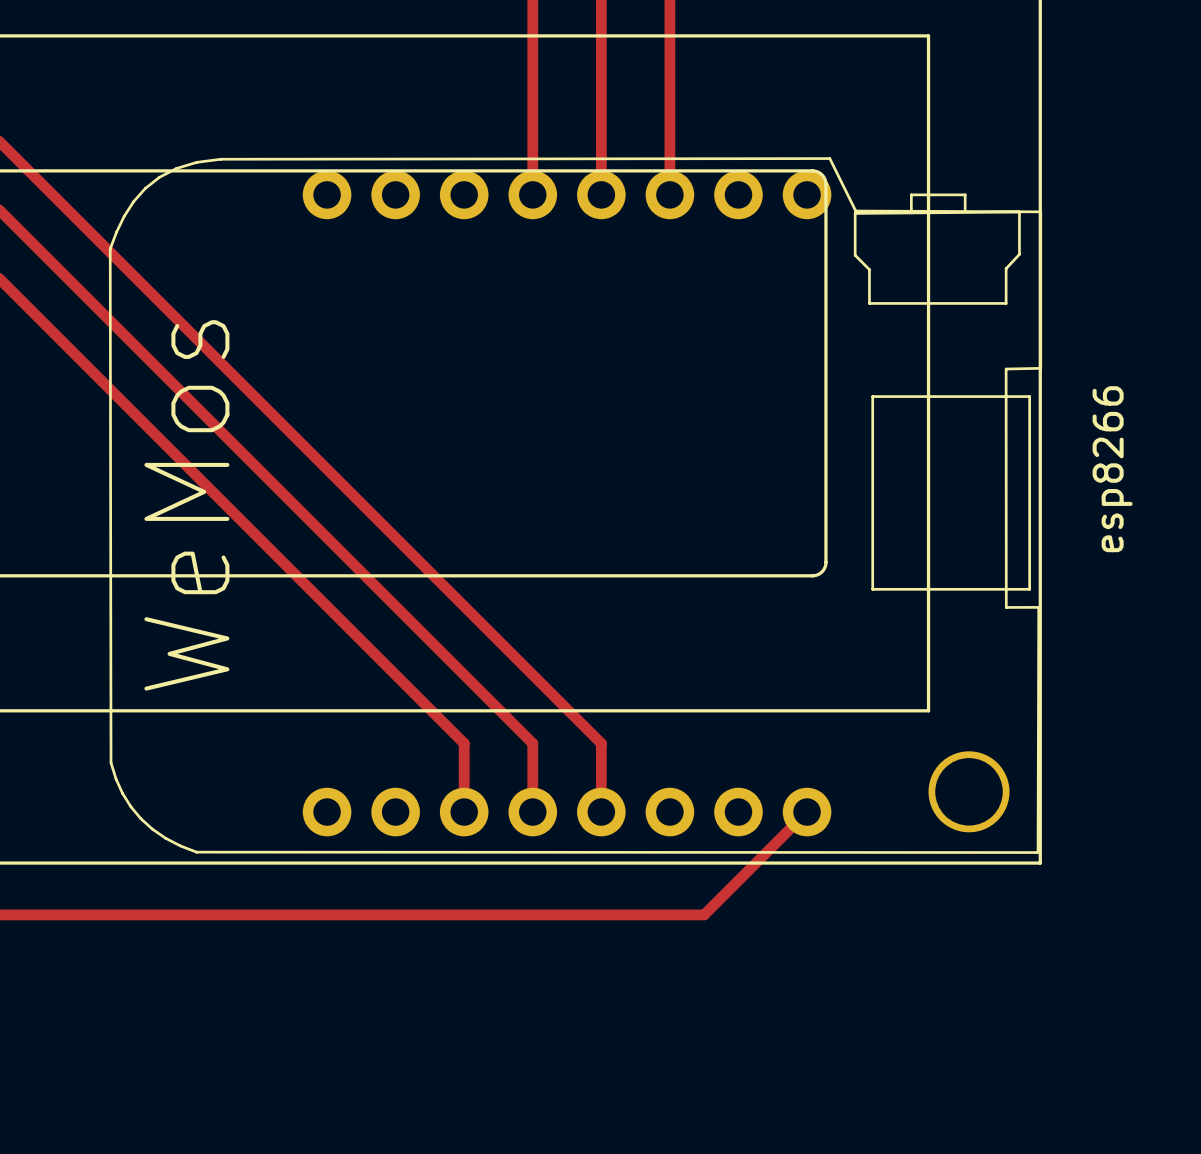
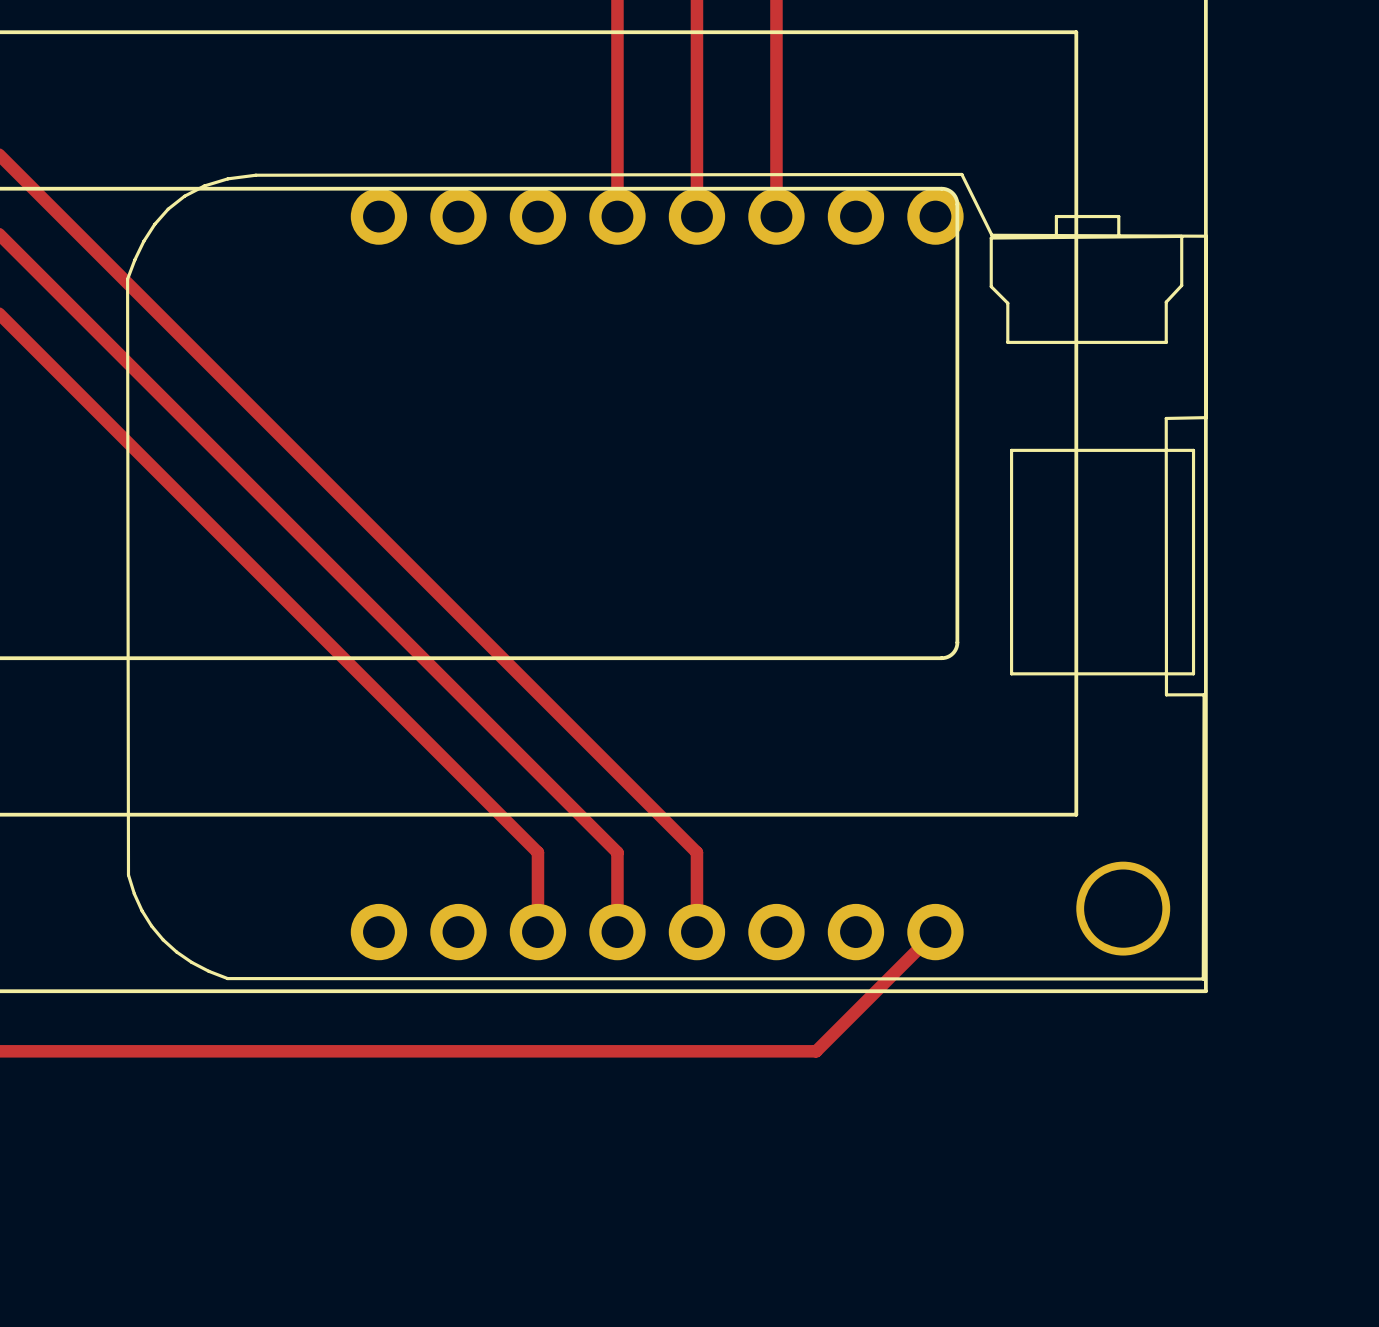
esp8266 name: esp8266 (1112, 469) -> none
esp8266 text: WeMos (186, 505) -> none

